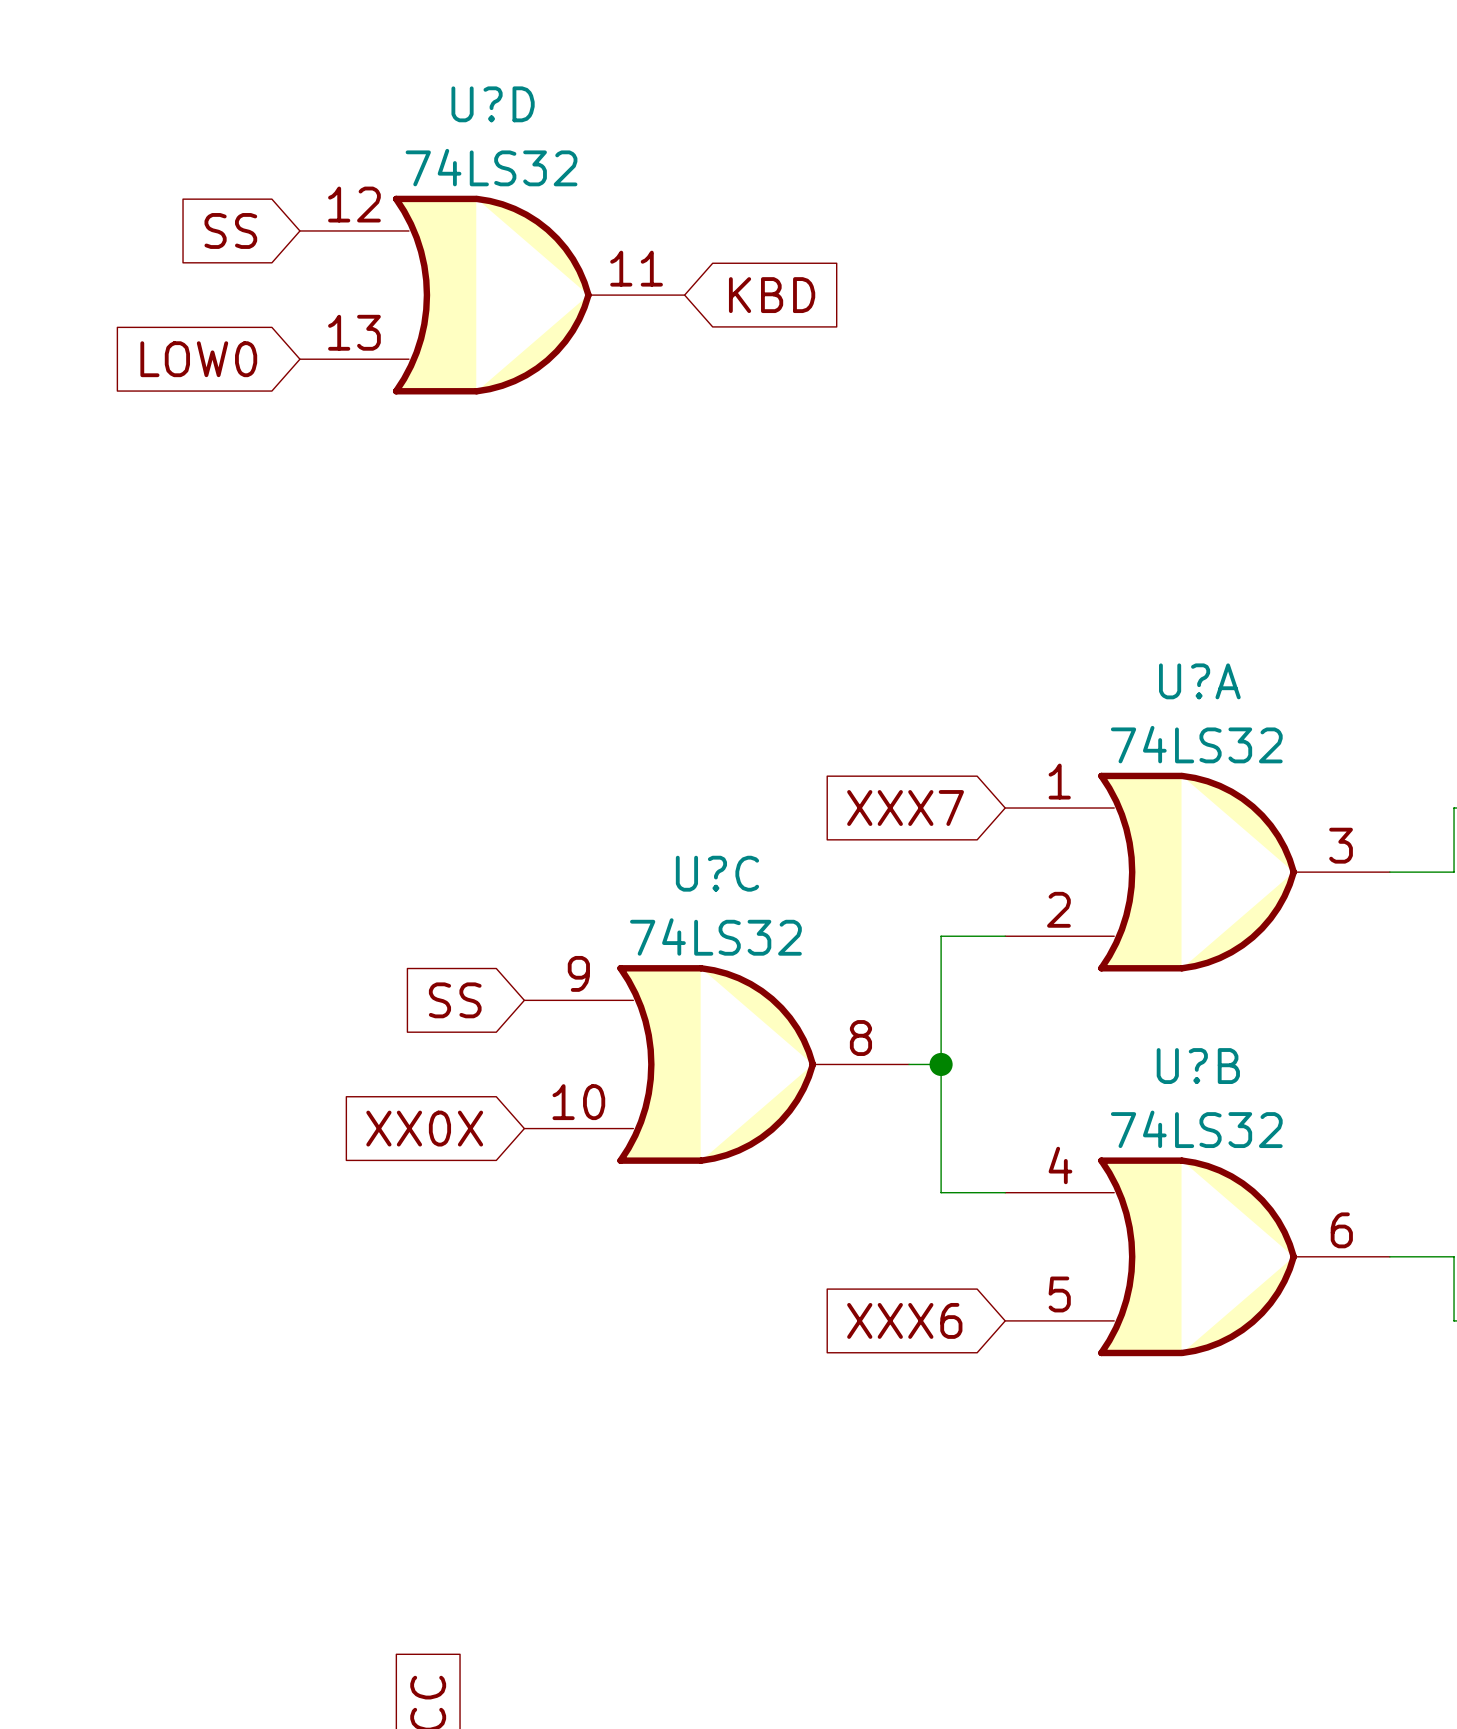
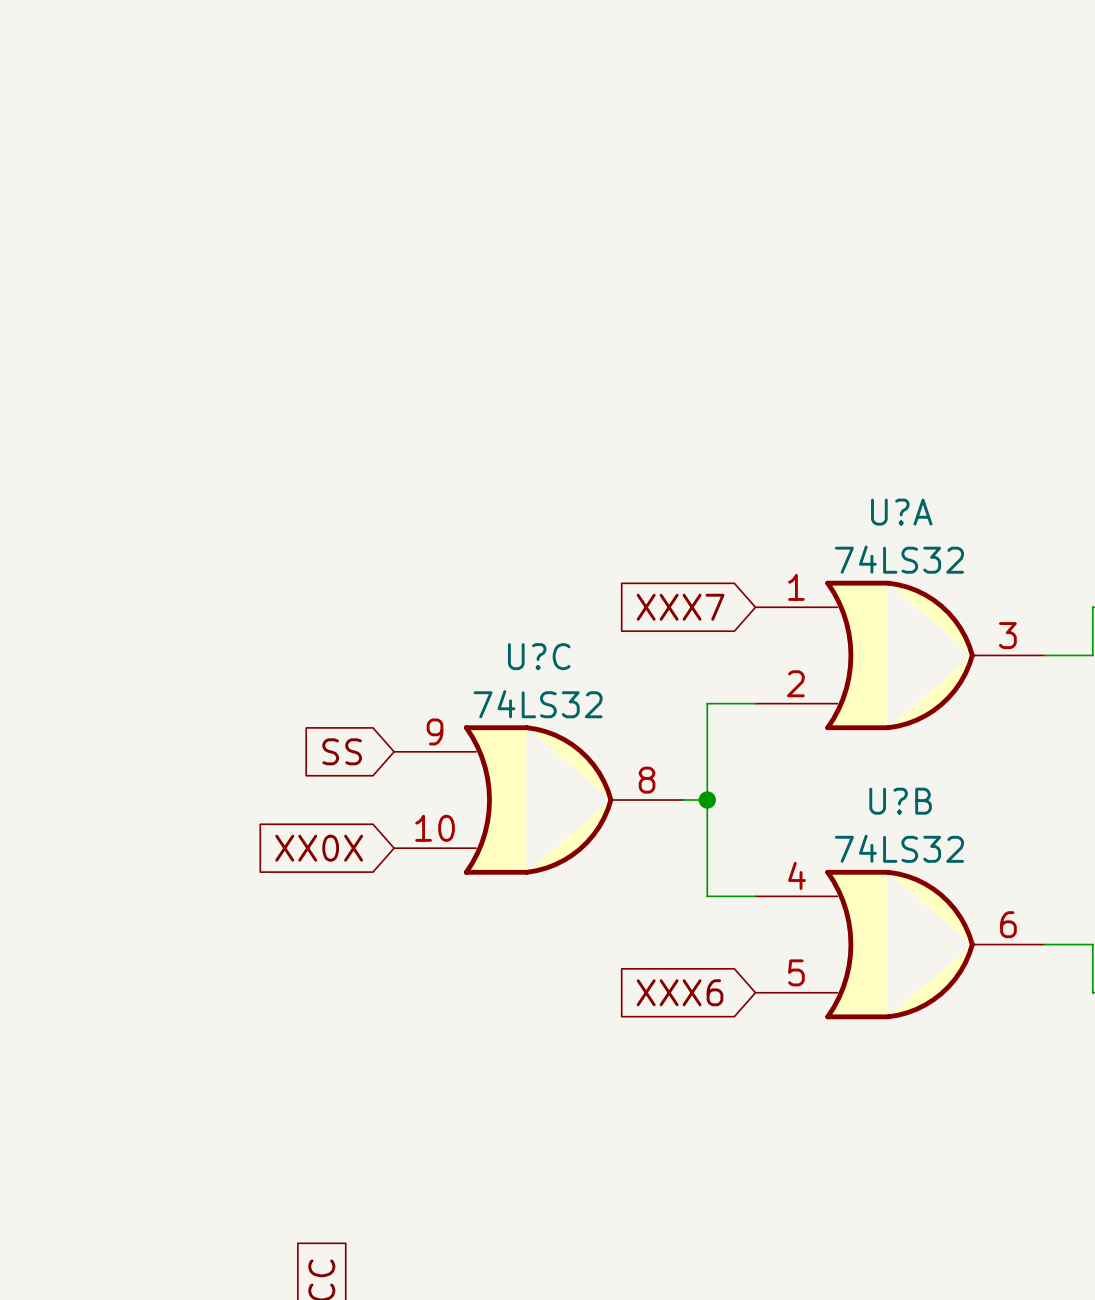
global label: SS (230, 230) -> none
U?D: 74LS32 (492, 295) -> none
global label: KBD (772, 295) -> none
global label: LOW0 (198, 359) -> none

